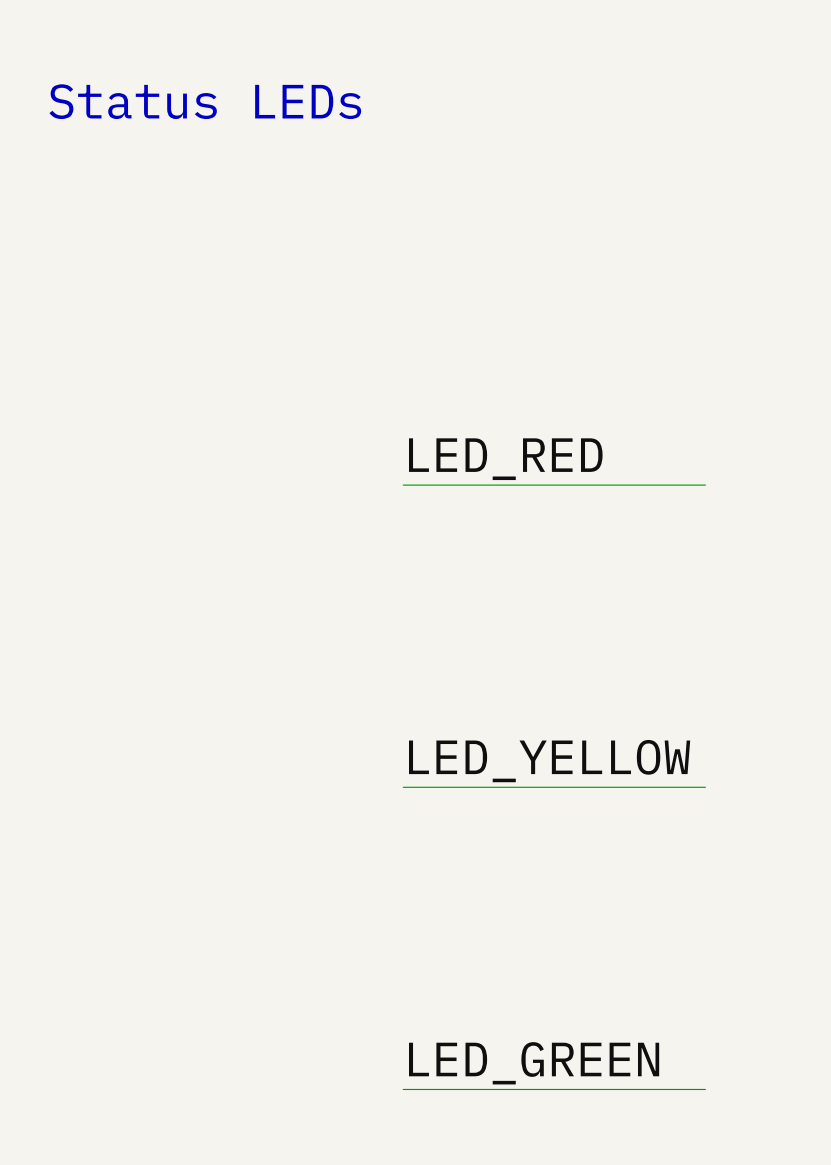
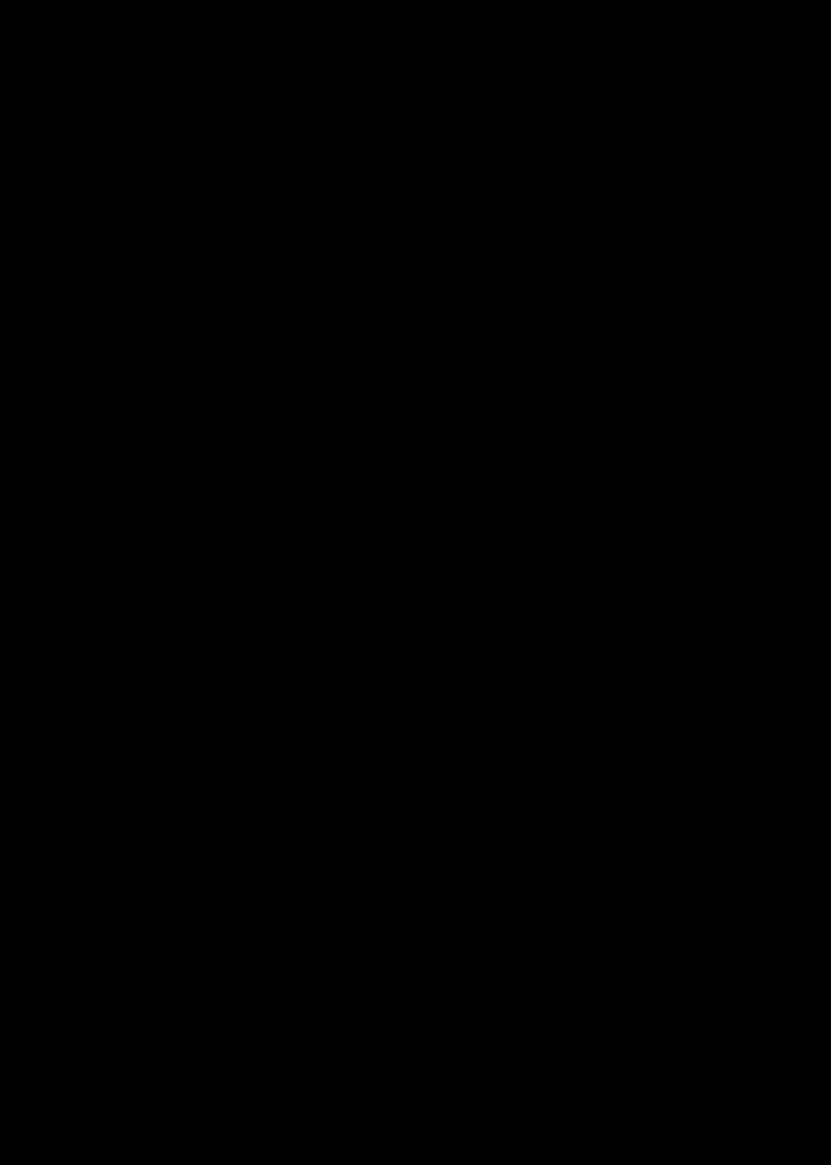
text: Status LEDs (205, 101) -> none
label: LED_RED (505, 459) -> none
wire: (403, 485) (705, 485) -> none
label: LED_YELLOW (549, 761) -> none
wire: (403, 787) (705, 787) -> none
label: LED_GREEN (534, 1063) -> none
wire: (403, 1089) (705, 1089) -> none

